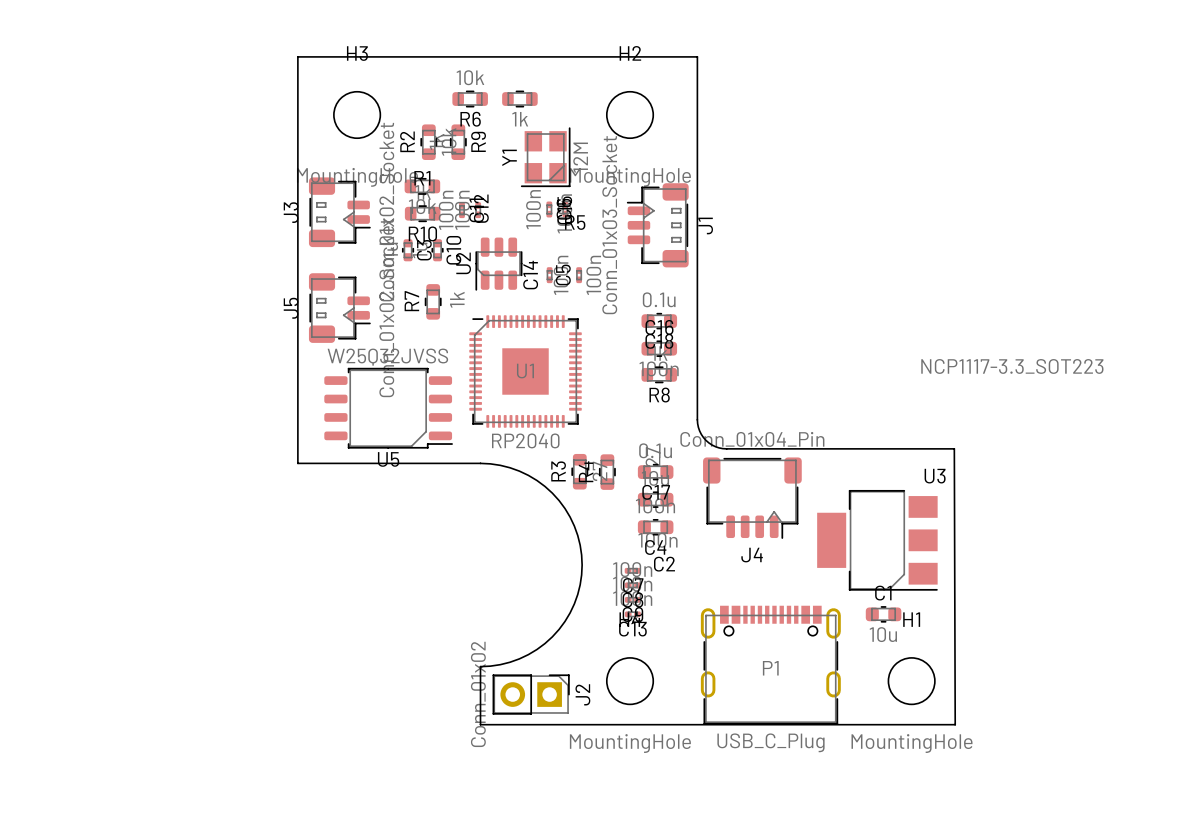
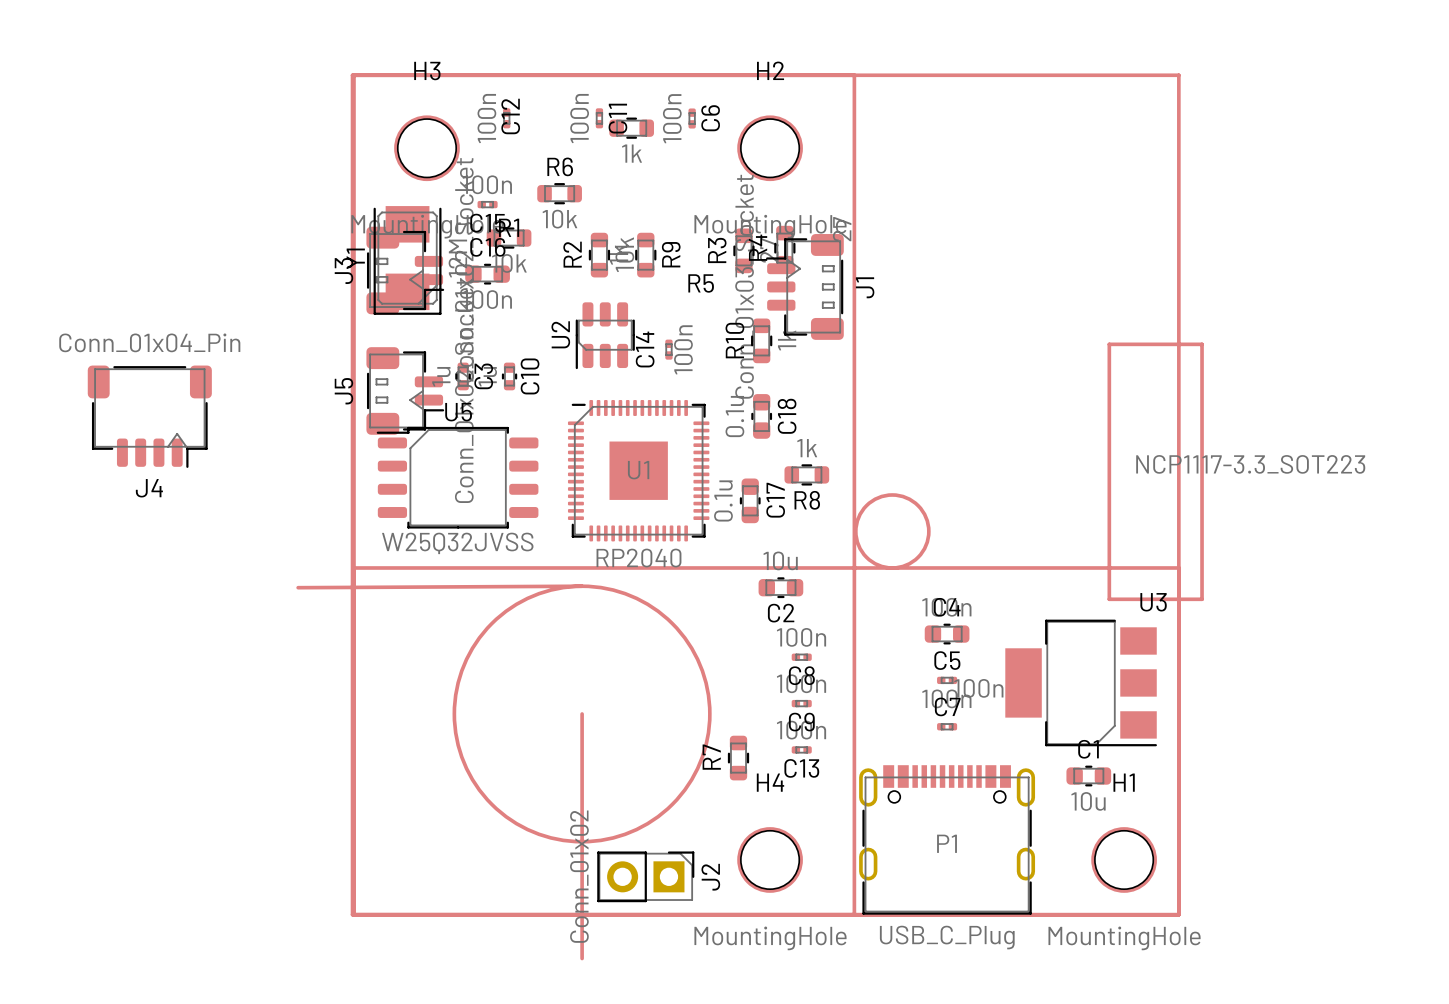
board edge: (297, 56) (697, 56) (697, 419) (699, 430) (708, 442) (722, 448) (954, 448) (955, 724) (480, 724) (480, 666) (510, 662) (536, 649) (559, 629) (570, 612) (577, 594) (581, 574) (581, 555) (577, 535) (565, 508) (552, 493) (528, 475) (510, 467) (480, 463) (297, 463) (297, 56) -> none
track: none -> (352, 75) (1178, 75) (1178, 914) (352, 914) (352, 75)
track: none -> (353, 75) (353, 914)
track: none -> (854, 75) (854, 914)
R6 value position: 10k (470, 77) -> 10k (559, 219)
drawing: none -> [394, 115, 460, 182]
drawing: none -> [737, 115, 803, 182]
R6 position: (470, 99) -> (559, 193)
R6 name position: R6 (470, 119) -> R6 (560, 166)
Y1 footprint: [520, 127, 571, 188] -> [373, 206, 442, 315]
R2 position: (428, 142) -> (599, 255)
R9 position: (458, 142) -> (645, 255)
C6 position: (549, 209) -> (692, 118)
C15 rotation: 0° (565, 209) -> 90° clockwise (487, 204)
C15 position: (565, 209) -> (487, 204)
C11 position: (461, 210) -> (599, 118)
C12 position: (478, 210) -> (506, 118)
R10 rotation: 0° (422, 213) -> 90° clockwise (761, 340)
R10 position: (422, 213) -> (761, 340)
C3 position: (408, 250) -> (463, 376)
C10 position: (437, 250) -> (509, 376)
track: none -> (1109, 344) (1202, 344) (1202, 599) (1109, 599) (1109, 344)
C5 rotation: 0° (579, 275) -> 90° clockwise (947, 680)
C5 position: (579, 275) -> (947, 680)
R7 value: 1k (457, 299) -> none
C18 value position: 0.1u (659, 299) -> 0.1u (734, 416)
R7 position: (433, 301) -> (738, 758)
C18 rotation: 0° (659, 321) -> 90° clockwise (761, 416)
C18 position: (659, 321) -> (761, 416)
C18 name position: C18 (659, 341) -> C18 (787, 416)
C16 position: (659, 348) -> (487, 274)
drawing: none -> [854, 493, 931, 570]
U5 rotation: 0° (388, 408) -> 180° (457, 477)
track: none -> (353, 567) (1178, 567)
C17 value position: 0.1u (655, 450) -> 0.1u (723, 500)
drawing: none -> [452, 584, 712, 844]
track: none -> (582, 586) (298, 587)
R3 position: (579, 471) -> (743, 250)
R4 position: (607, 472) -> (784, 248)
C17 rotation: 0° (655, 472) -> 90° clockwise (750, 500)
C17 position: (655, 472) -> (750, 500)
C17 name position: C17 (656, 492) -> C17 (775, 500)
J4 position: (752, 498) -> (149, 416)
C2 position: (655, 499) -> (780, 587)
C4 position: (655, 527) -> (947, 634)
C4 name position: C4 (655, 547) -> C4 (947, 607)
C2 name position: C2 (664, 564) -> C2 (781, 613)
track: none -> (582, 713) (582, 958)
C7 position: (632, 570) -> (947, 726)
C8 position: (632, 585) -> (801, 657)
C7 name position: C7 (633, 585) -> C7 (947, 706)
C9 position: (632, 599) -> (801, 703)
C13 position: (632, 614) -> (801, 749)
drawing: none -> [737, 827, 803, 893]
drawing: none -> [1091, 827, 1157, 893]

